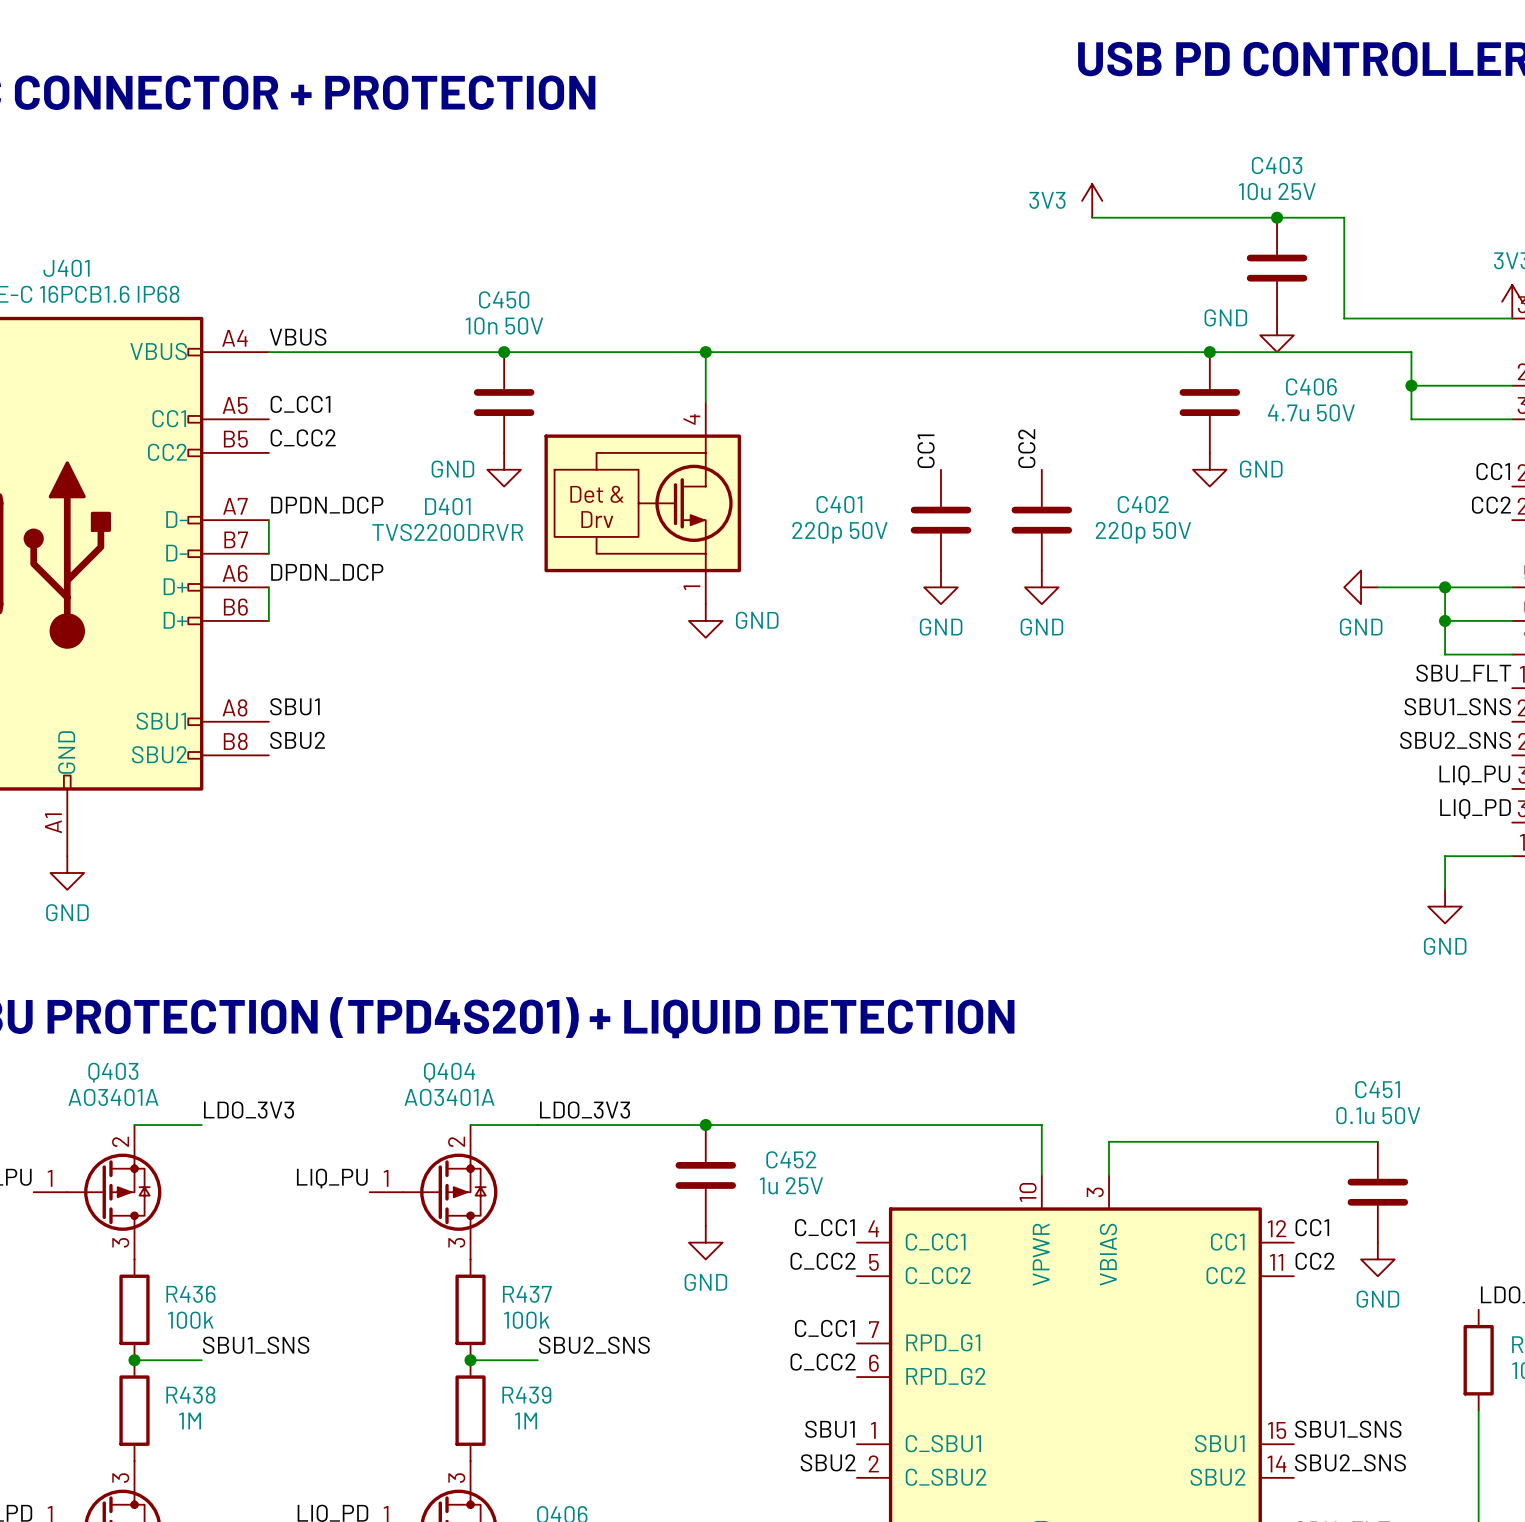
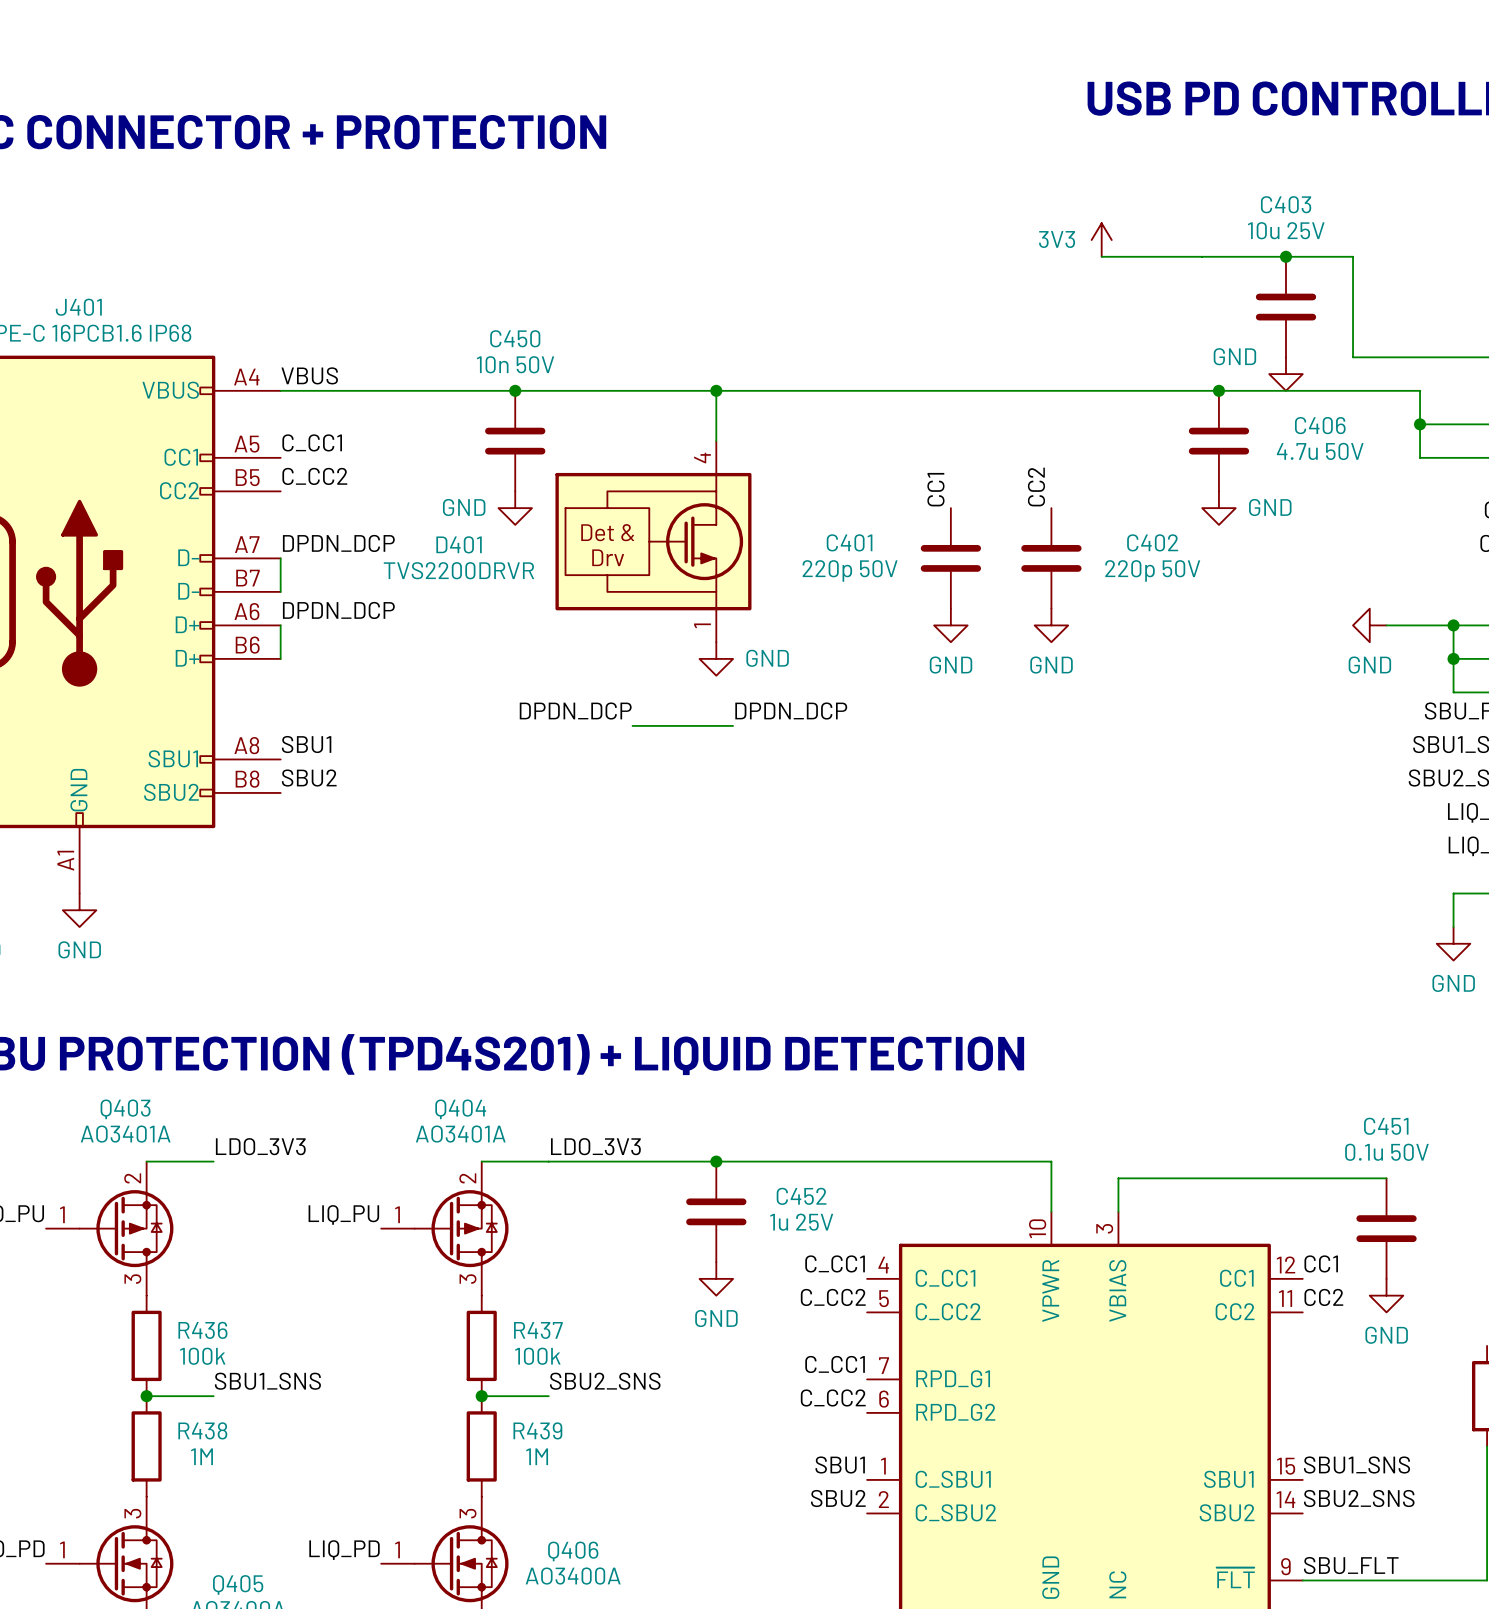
label: none -> DPDN_DCP (575, 711)
label: none -> DPDN_DCP (791, 711)
wire: none -> (632, 725) (733, 725)

